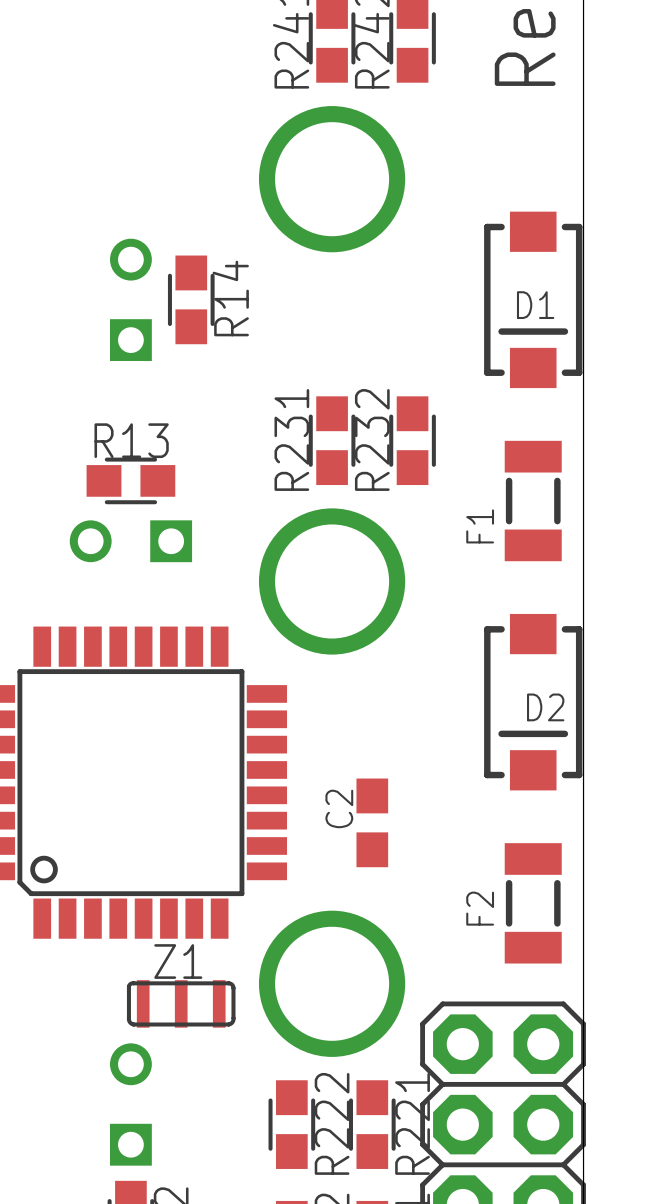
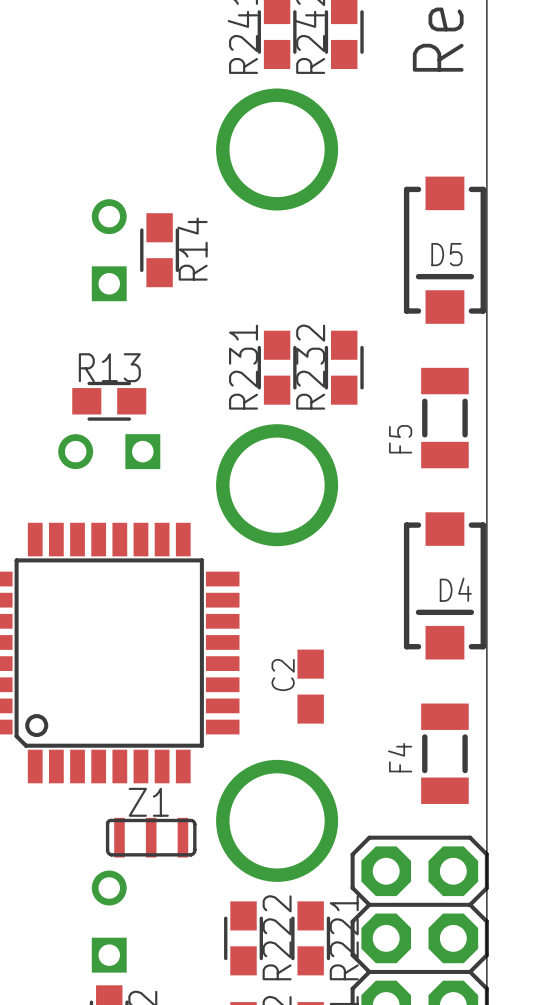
D1 name: D1 (535, 305) -> D5 (446, 254)
F1 name: F1 (480, 526) -> F5 (400, 439)
D2 name: D2 (545, 707) -> D4 (455, 589)
F2 name: F2 (480, 908) -> F4 (400, 757)

